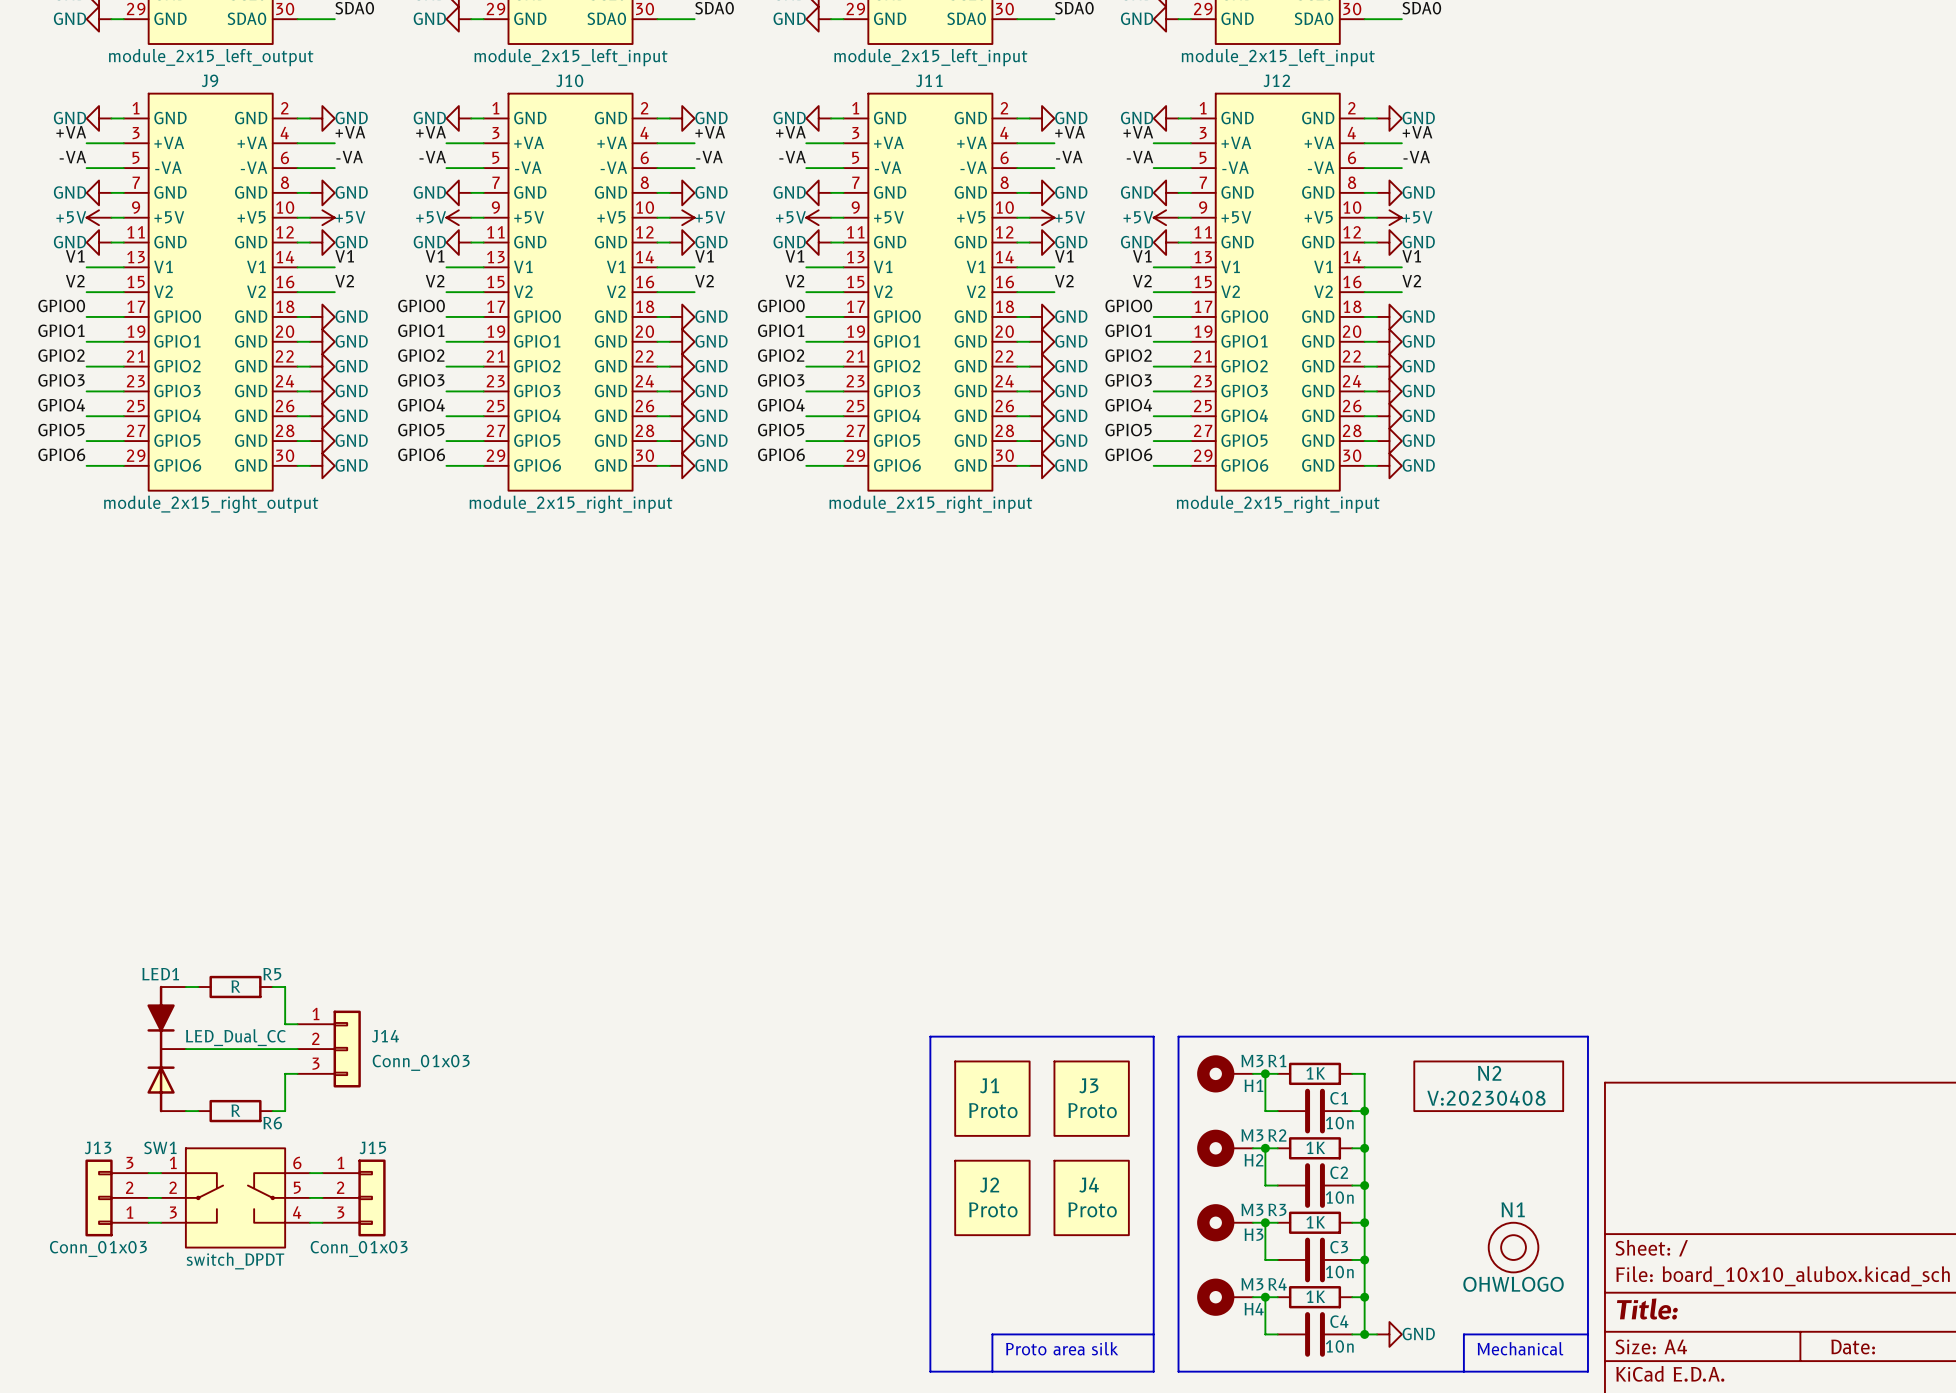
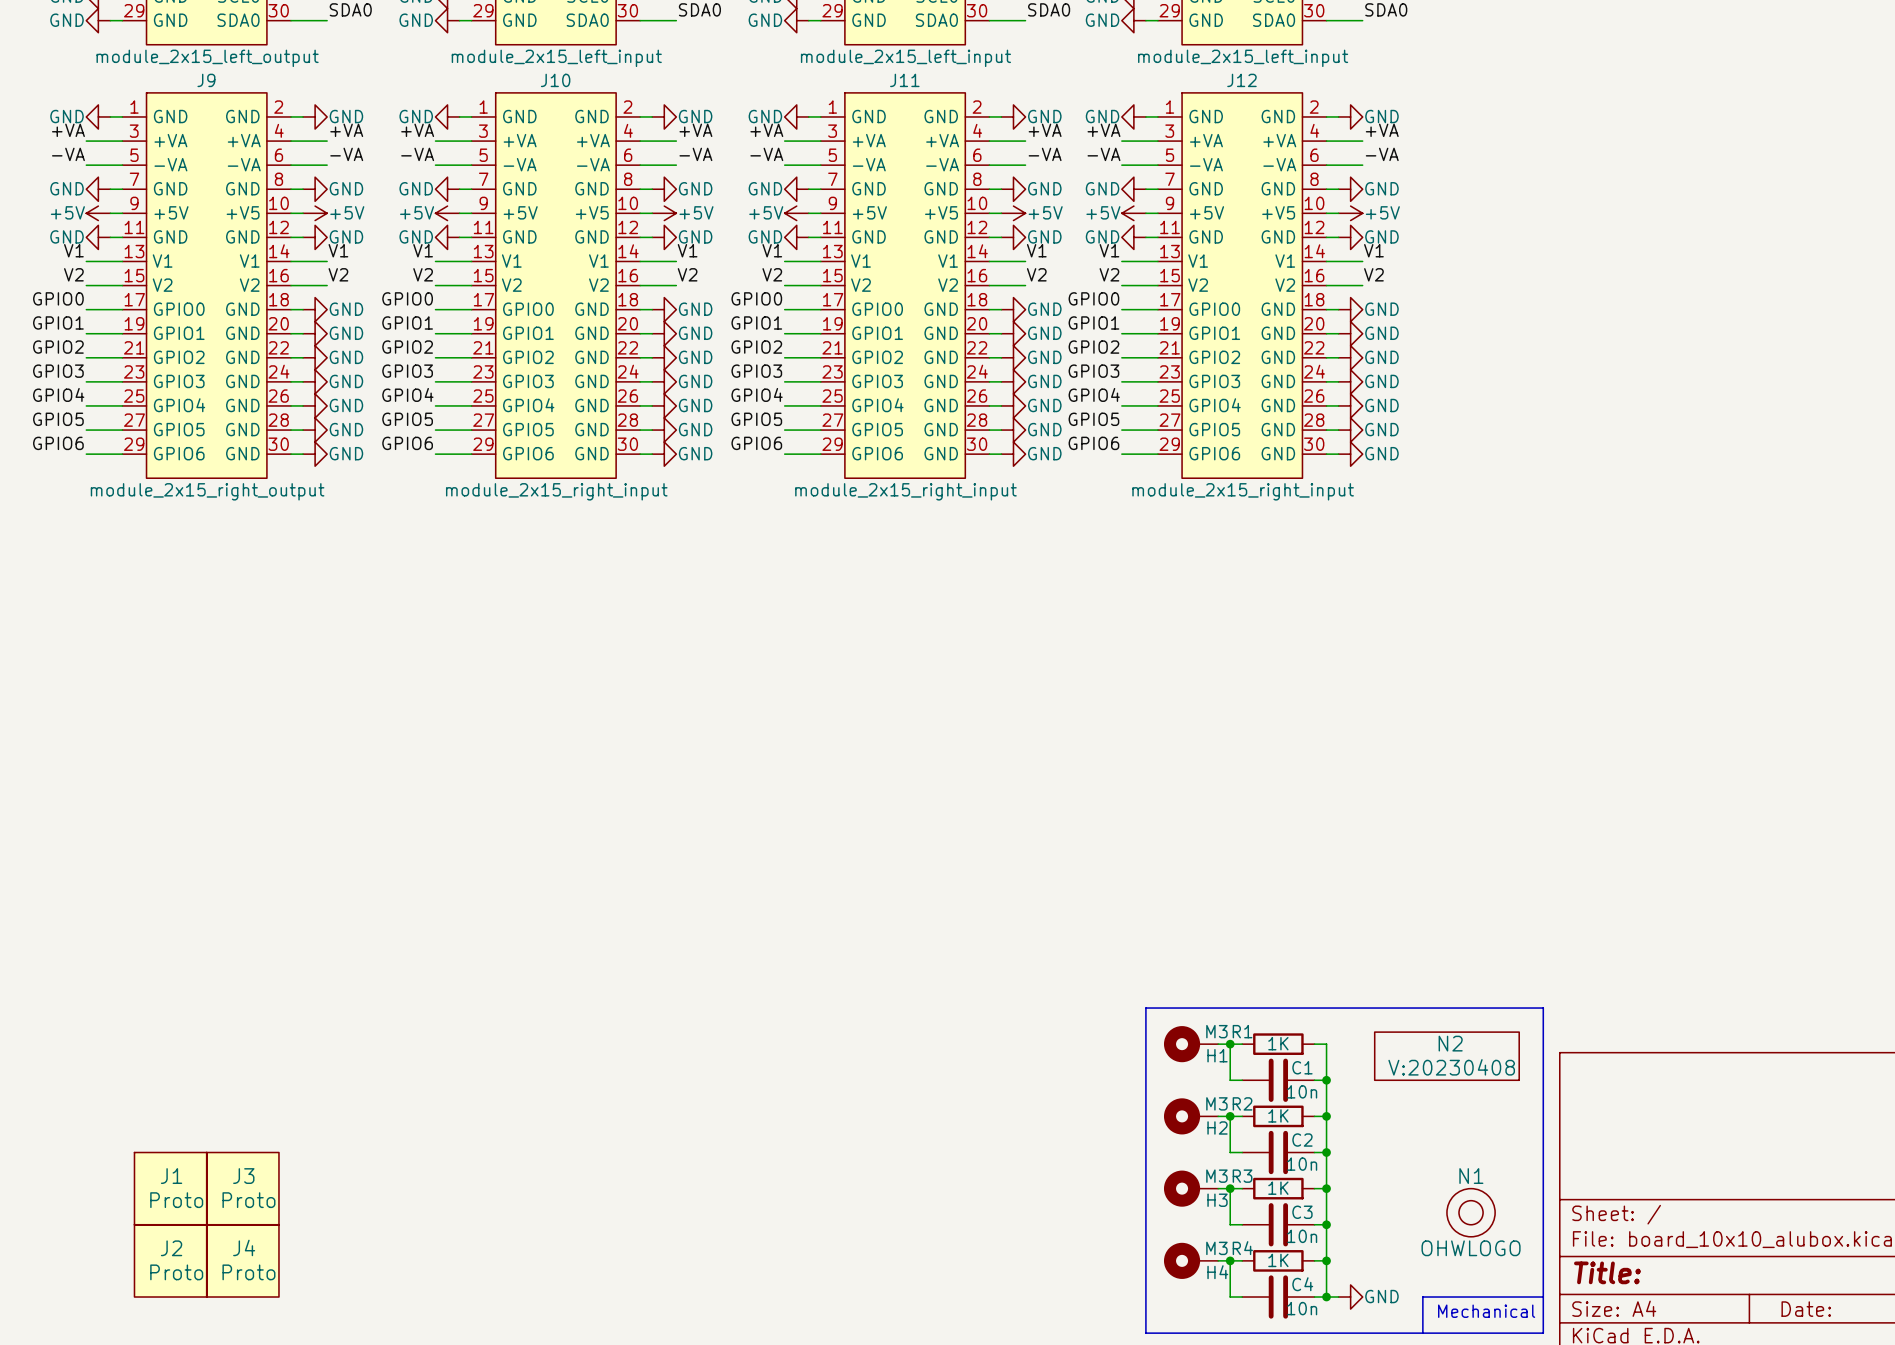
wire: (185, 987) (198, 987) -> none
R5: R (235, 987) -> none
wire: (272, 987) (285, 987) (285, 1024) (297, 1024) -> none
line: (930, 1036) (930, 1371) (1153, 1371) (1153, 1036) (930, 1036) -> none
LED1: LED_Dual_CC (166, 1049) -> none
wire: (185, 1049) (297, 1049) -> none
J14: Conn_01x03 (329, 1049) -> none
wire: (297, 1073) (285, 1073) (285, 1111) (272, 1111) -> none
J1 position: (992, 1098) -> (170, 1188)
J3 position: (1091, 1098) -> (242, 1188)
wire: (185, 1111) (198, 1111) -> none
R6: R (235, 1111) -> none
wire: (148, 1173) (161, 1173) -> none
wire: (309, 1173) (322, 1173) -> none
J13: Conn_01x03 (117, 1197) -> none
SW1: switch_DPDT (235, 1197) -> none
wire: (309, 1197) (322, 1197) -> none
J15: Conn_01x03 (354, 1197) -> none
J2 position: (992, 1197) -> (170, 1260)
J4 position: (1091, 1197) -> (242, 1260)
wire: (309, 1222) (322, 1222) -> none
line: (1153, 1334) (992, 1334) (992, 1371) -> none
text: Proto area silk (1062, 1348) -> none

